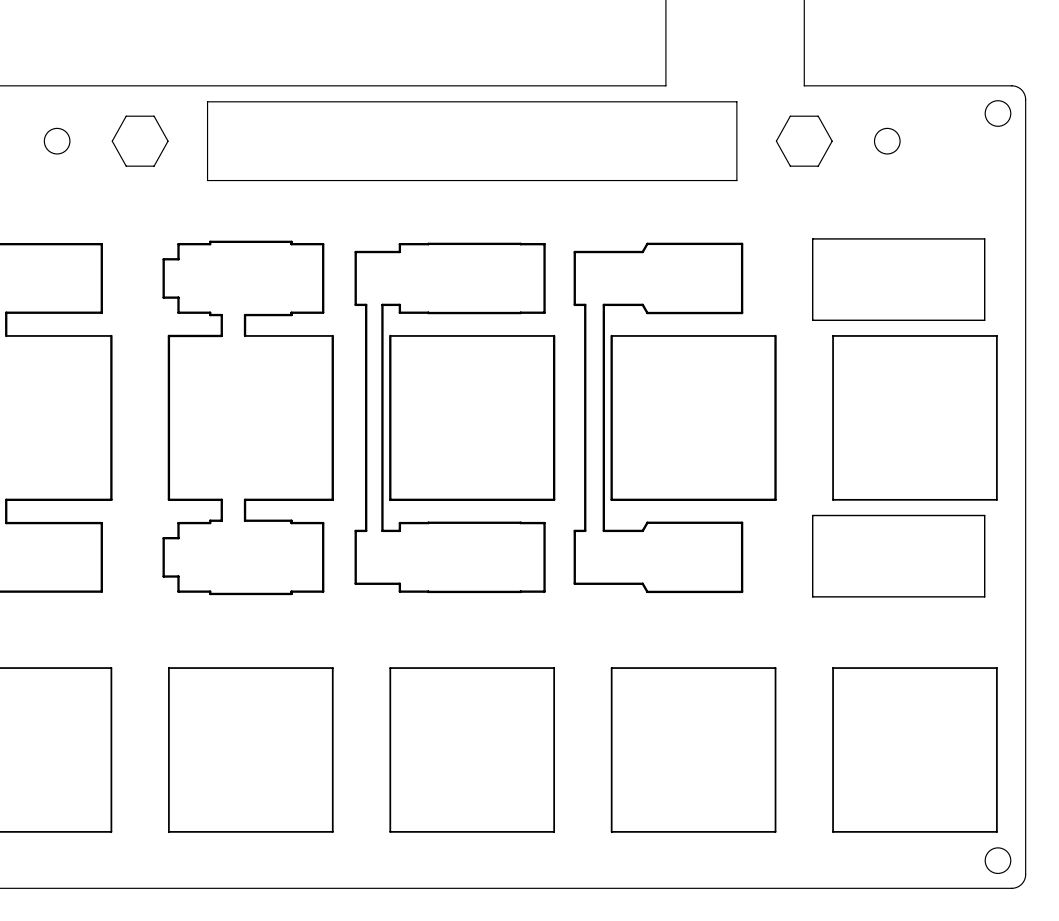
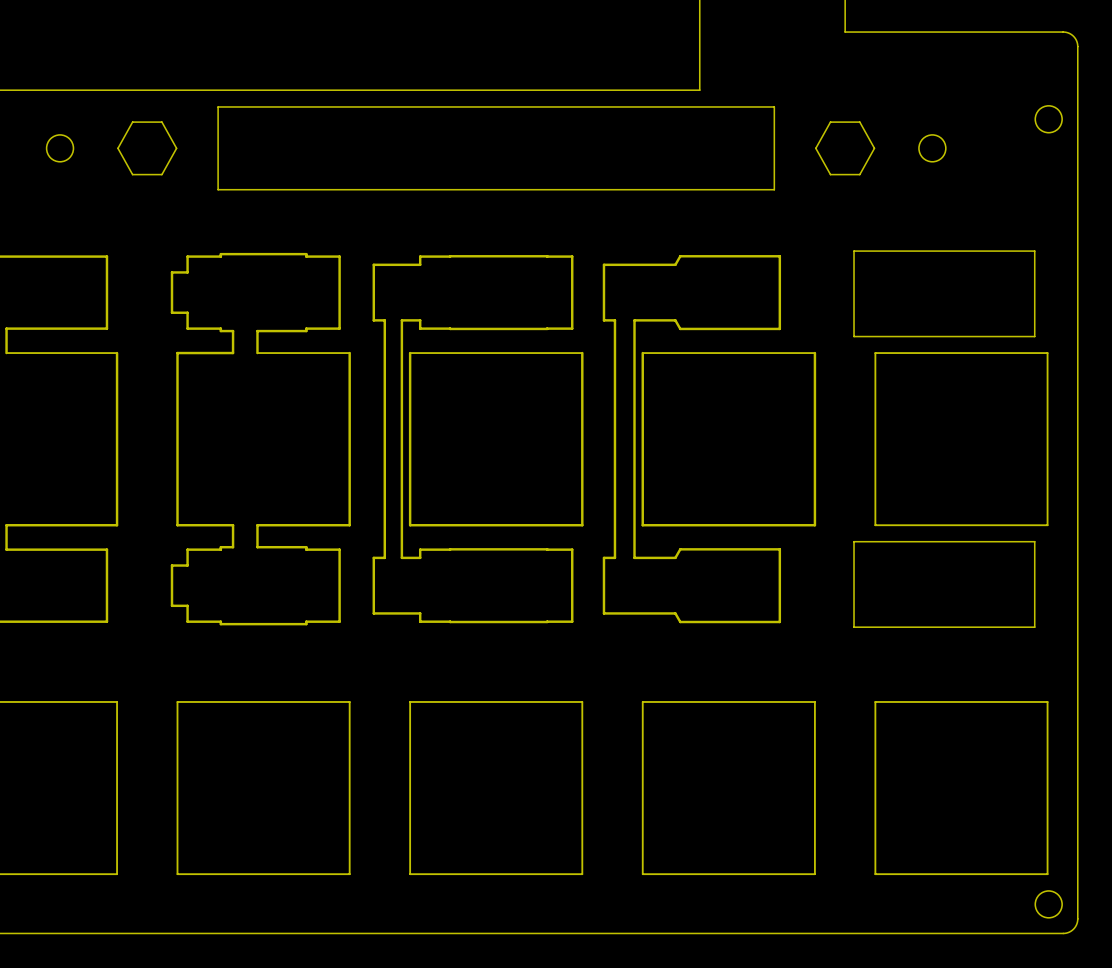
board edge: (804, 30) (804, 85) (1011, 85) (1021, 89) (1025, 99) -> (845, 32) (1068, 32) (1074, 37) (1077, 44) (1077, 104)

